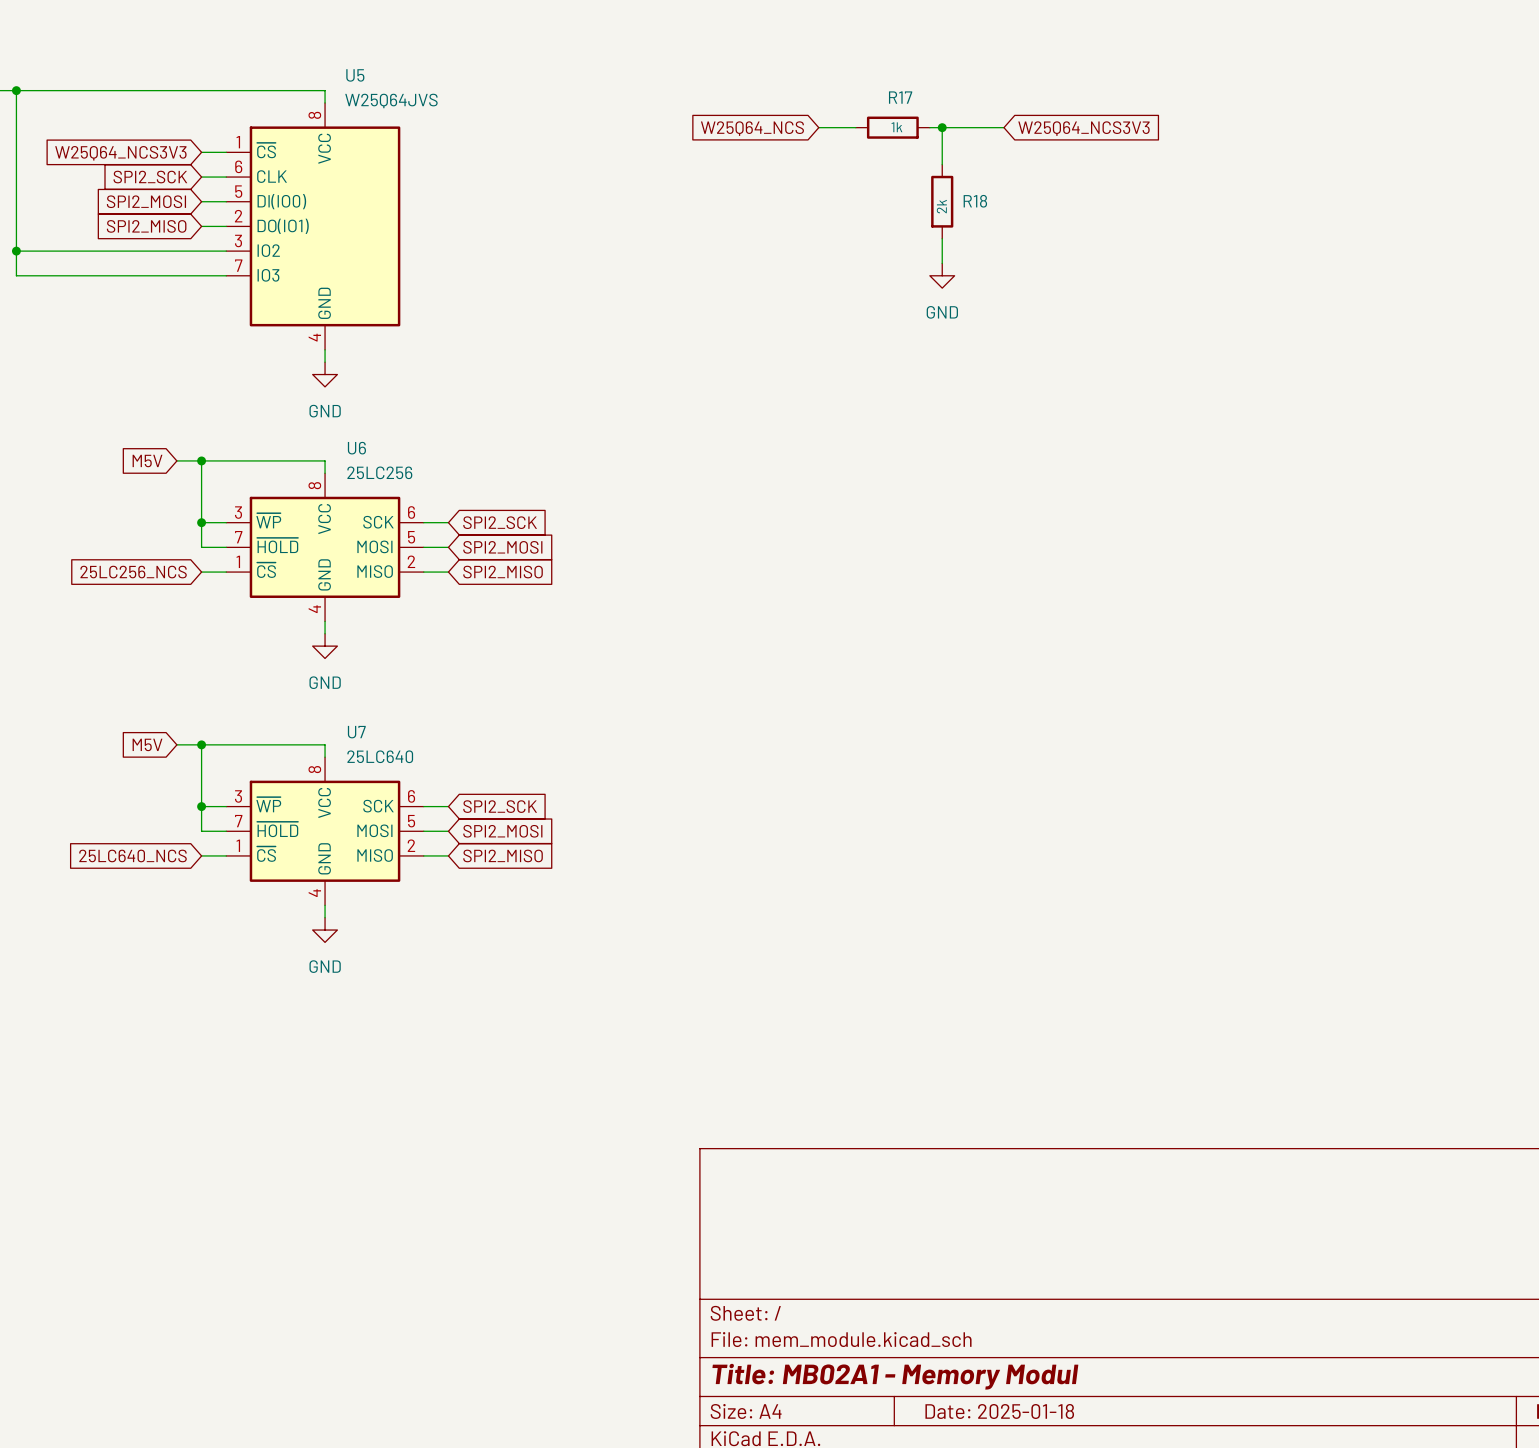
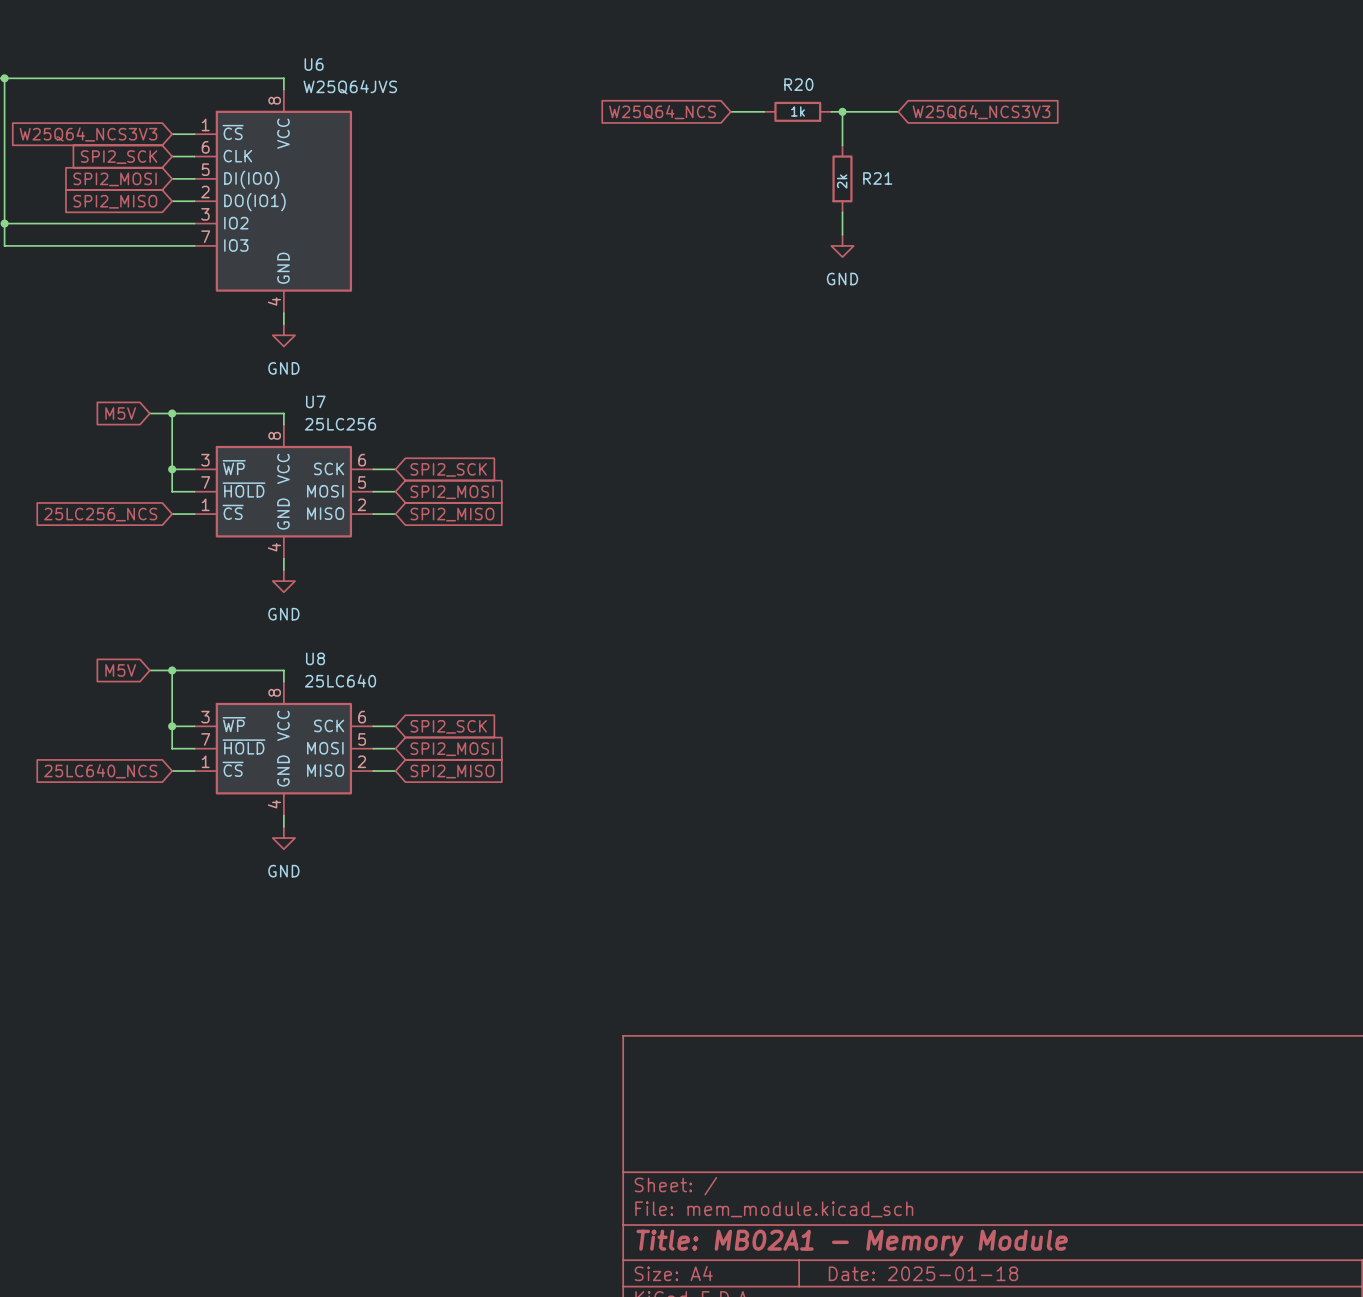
U5 name: U5 (355, 75) -> U6 (314, 64)
R17 name: R17 (900, 97) -> R20 (798, 84)
R18 name: R18 (975, 201) -> R21 (877, 178)
U6 name: U6 (356, 448) -> U7 (315, 401)
U7 name: U7 (356, 732) -> U8 (315, 658)
title block: Title: MB02A1 - Memory Modul (895, 1376) -> Title: MB02A1 - Memory Module (852, 1243)

